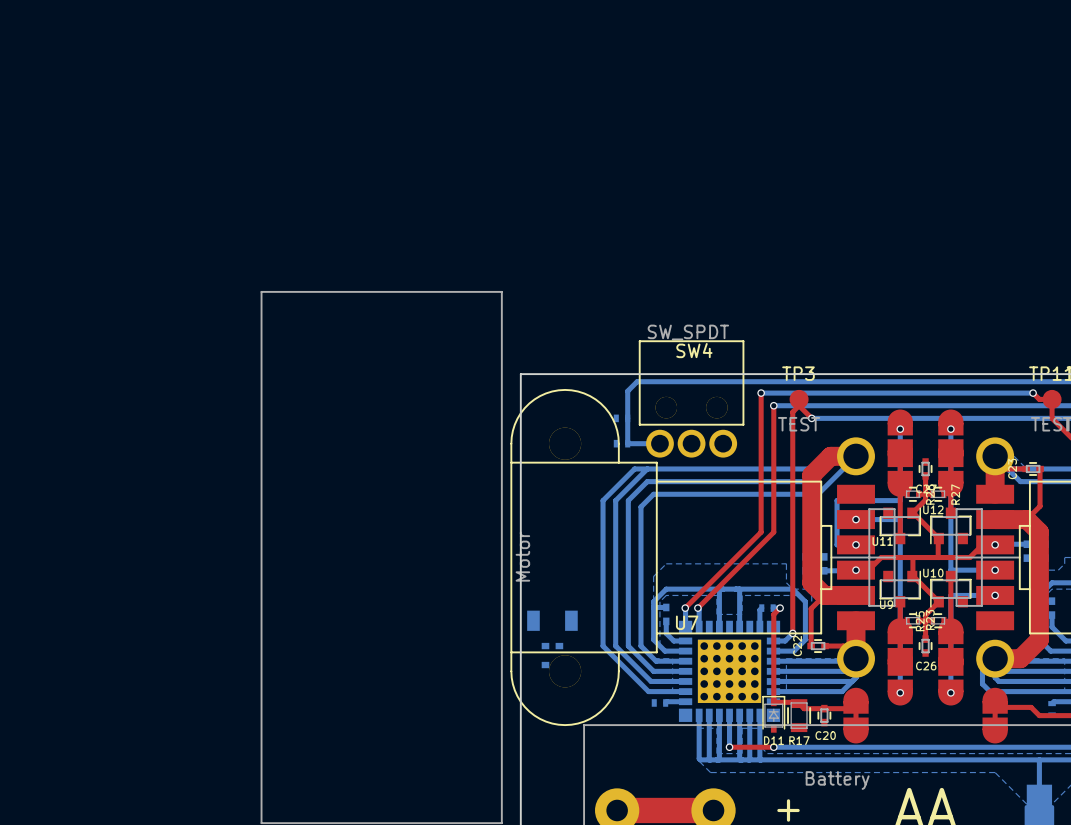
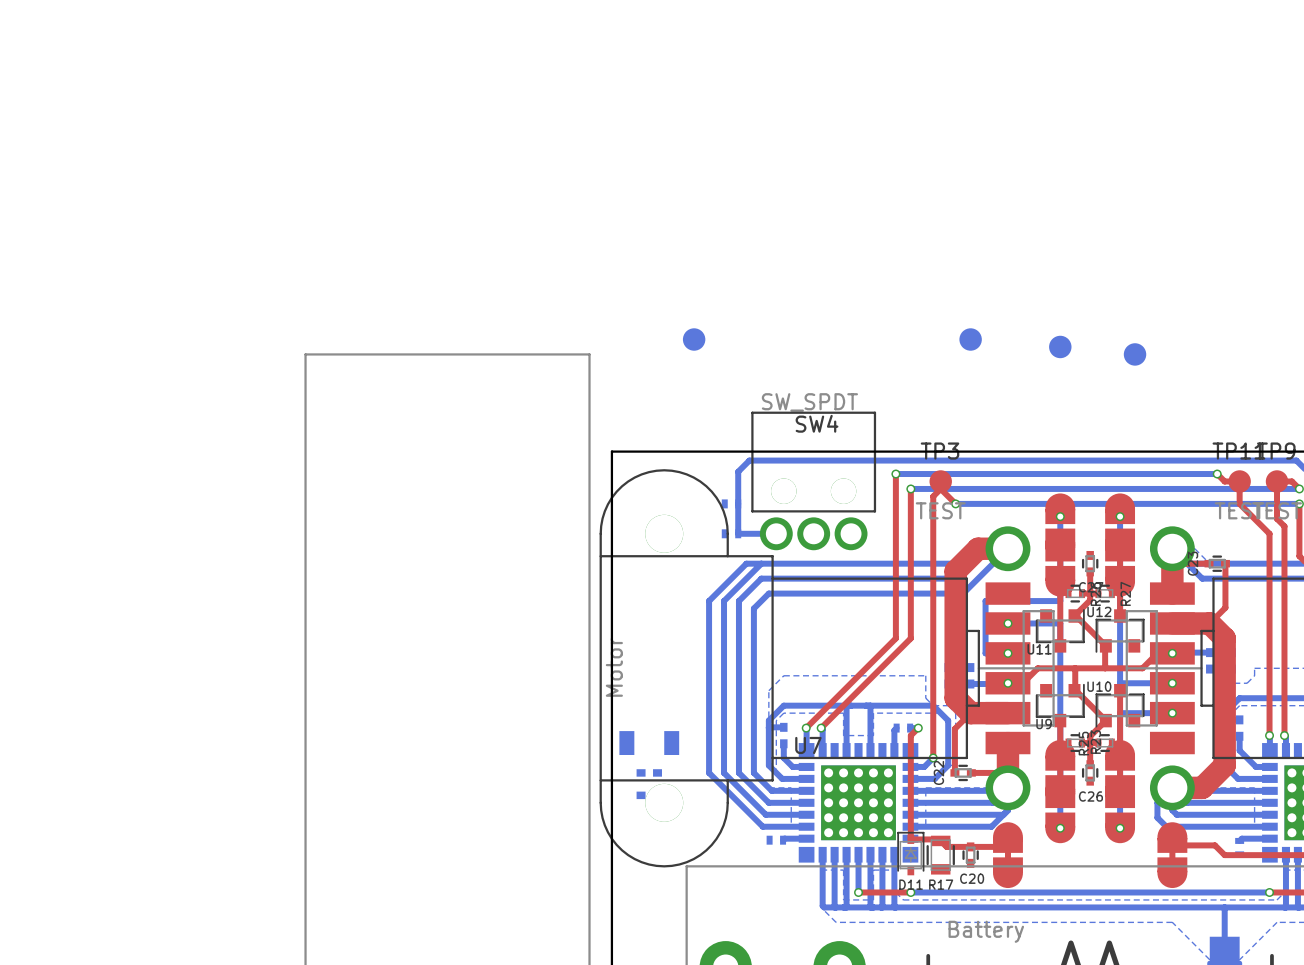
part: none -> (694, 339)
part: none -> (970, 339)
part: none -> (1060, 346)
part: none -> (1135, 354)

